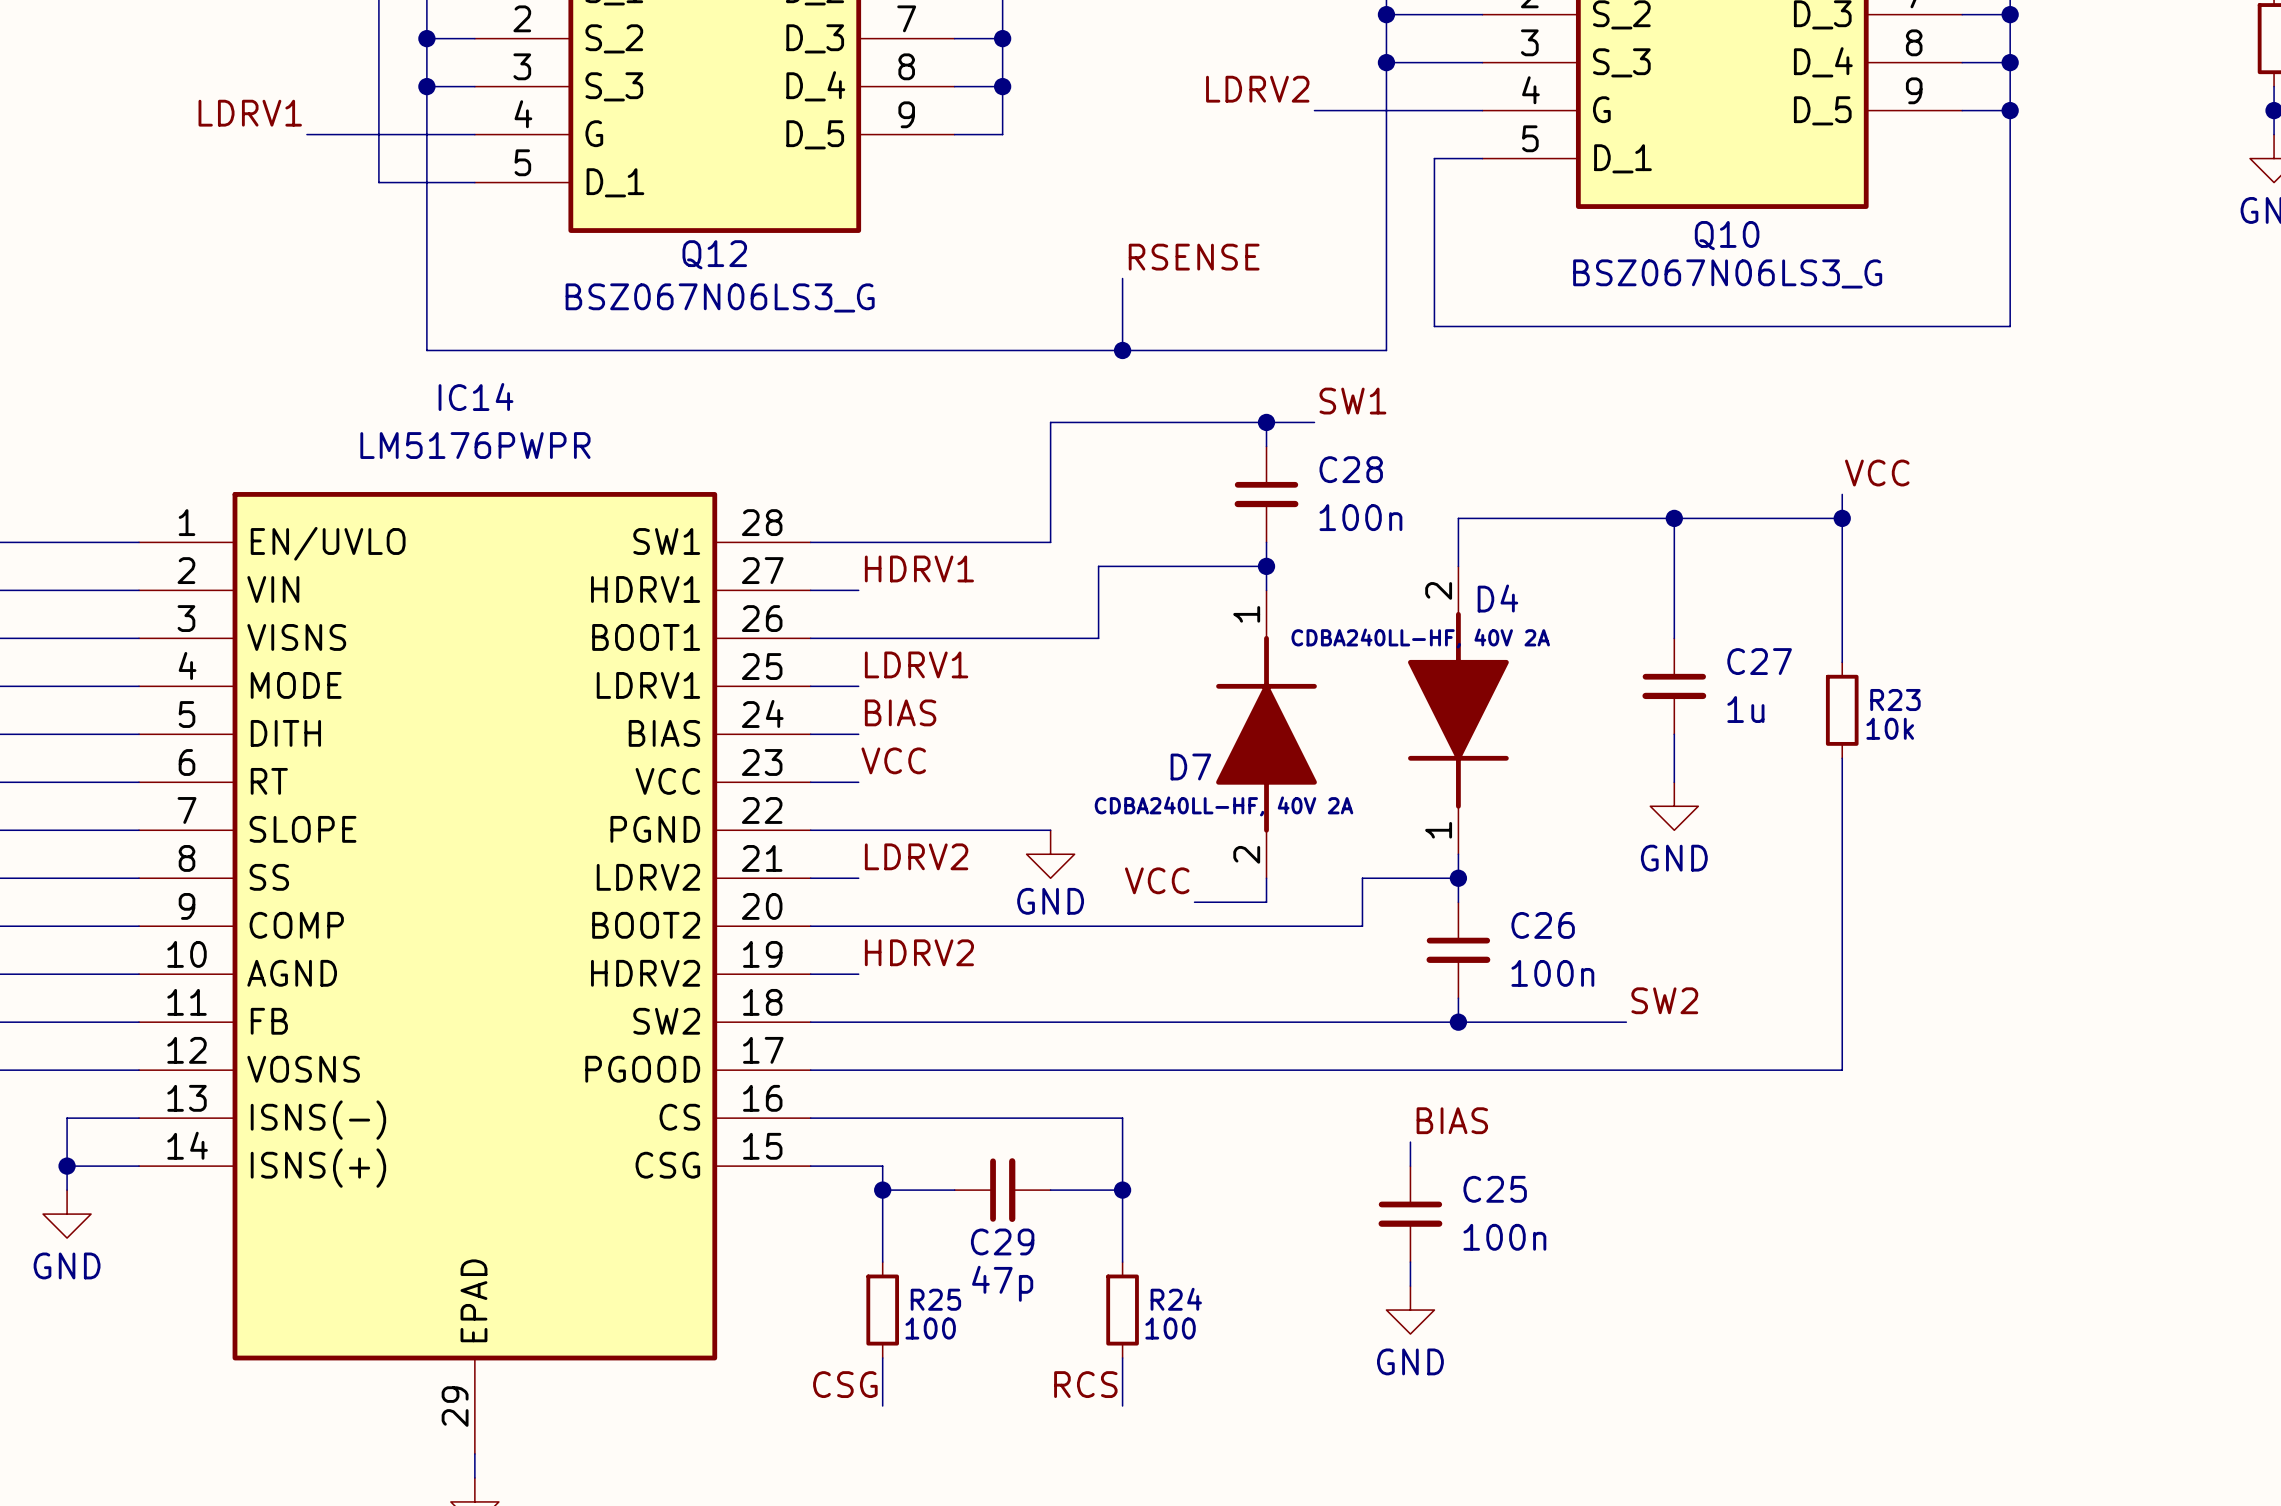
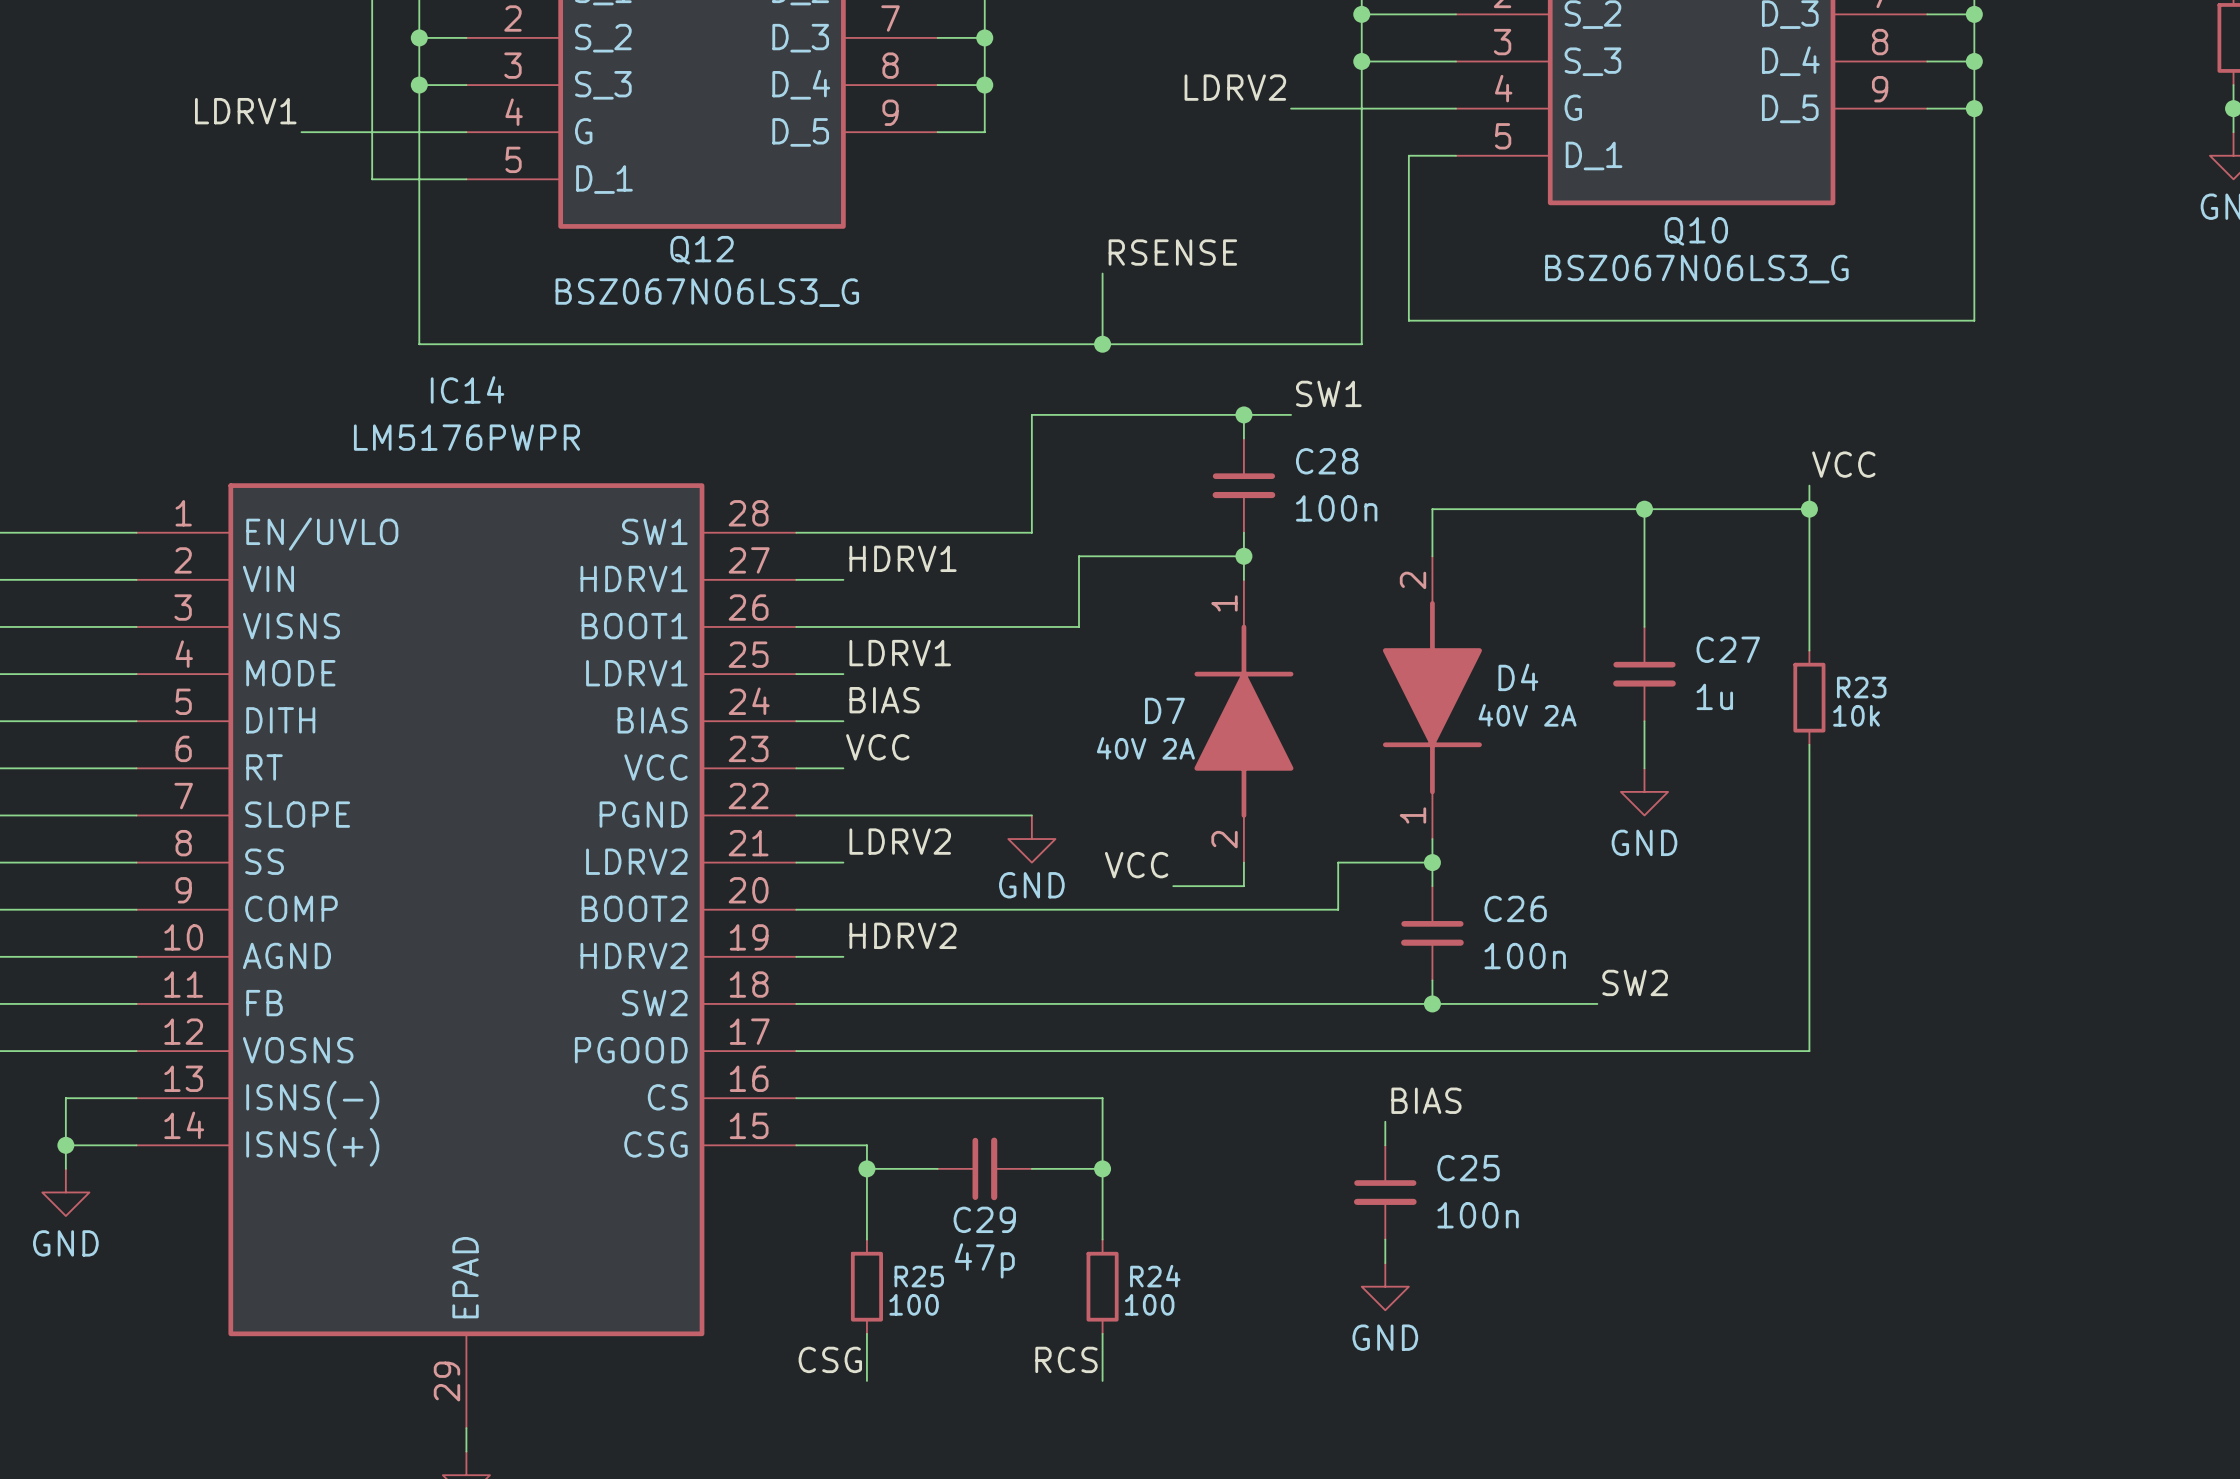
D4 name position: D4 (1497, 598) -> D4 (1518, 677)
D4 value: CDBA240LL-HF, 40V 2A (1420, 638) -> 40V 2A (1527, 715)
D7 name position: D7 (1190, 766) -> D7 (1164, 710)
D7 value: CDBA240LL-HF, 40V 2A (1224, 806) -> 40V 2A (1145, 748)

